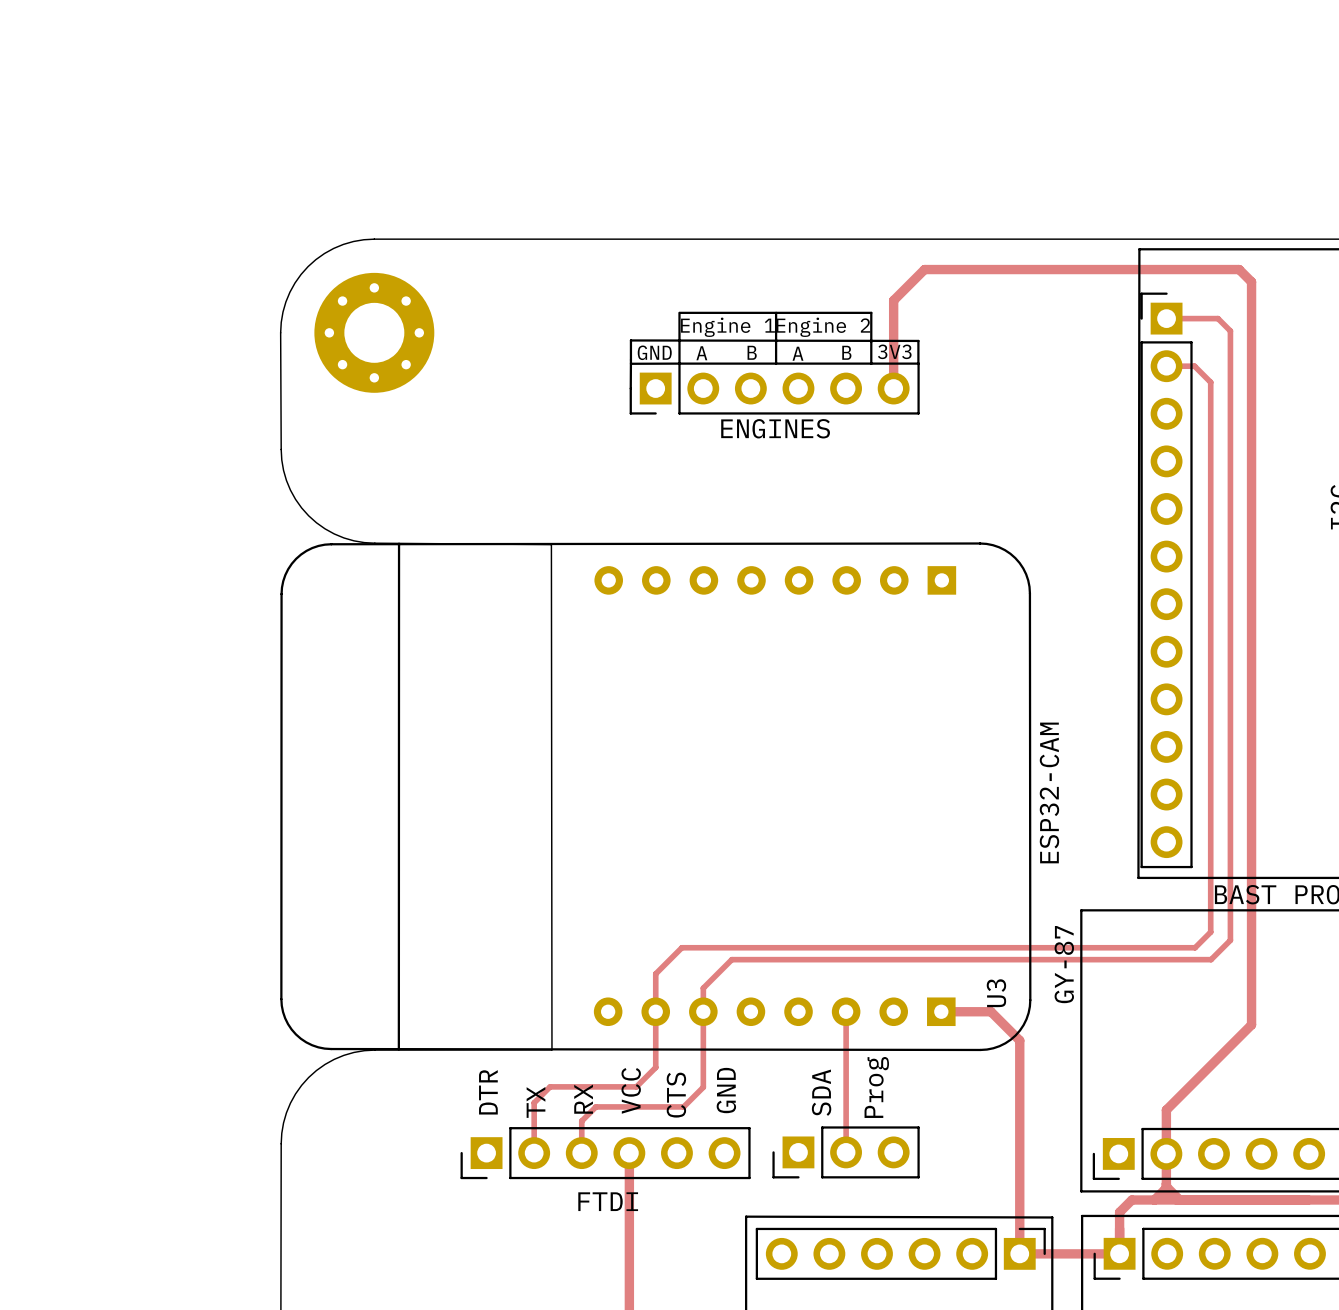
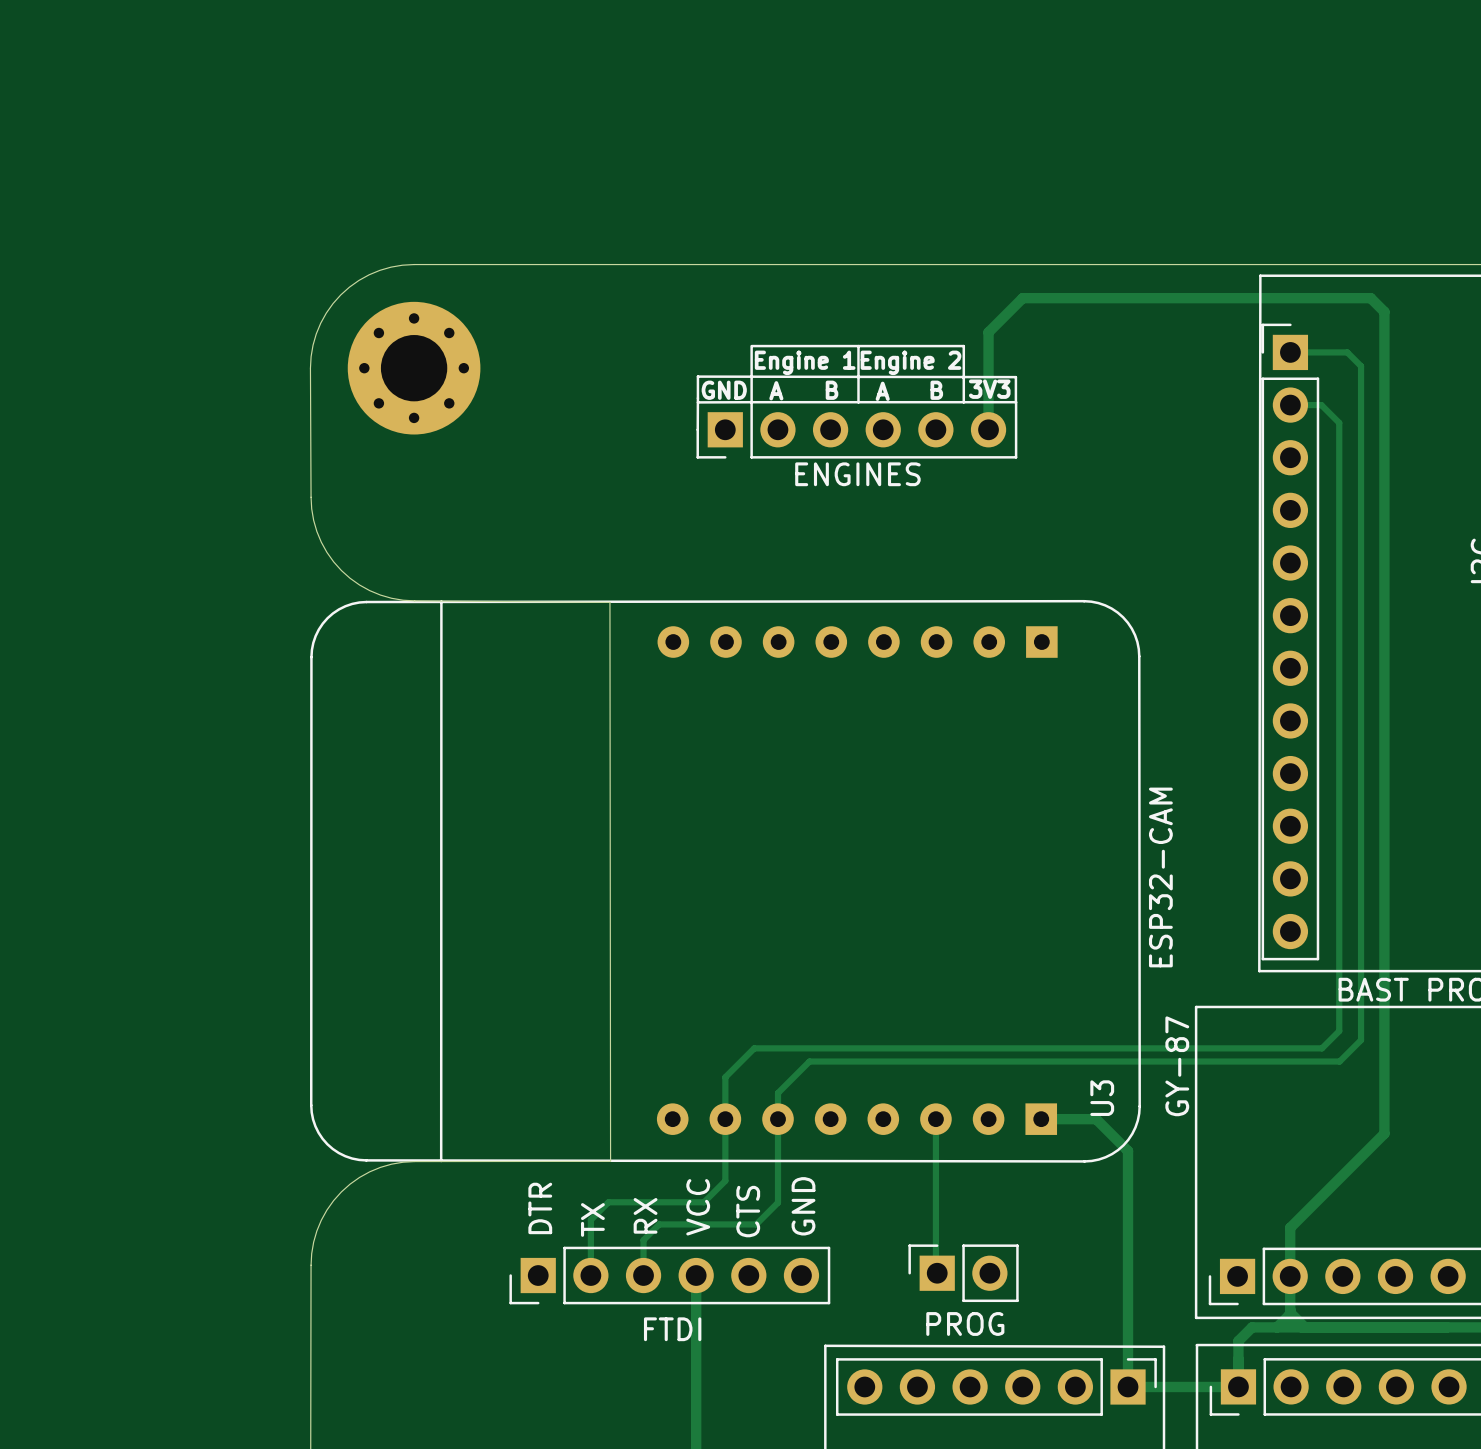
part: none -> PROG (963, 1273)
SDA: Prog (846, 1152) -> none

